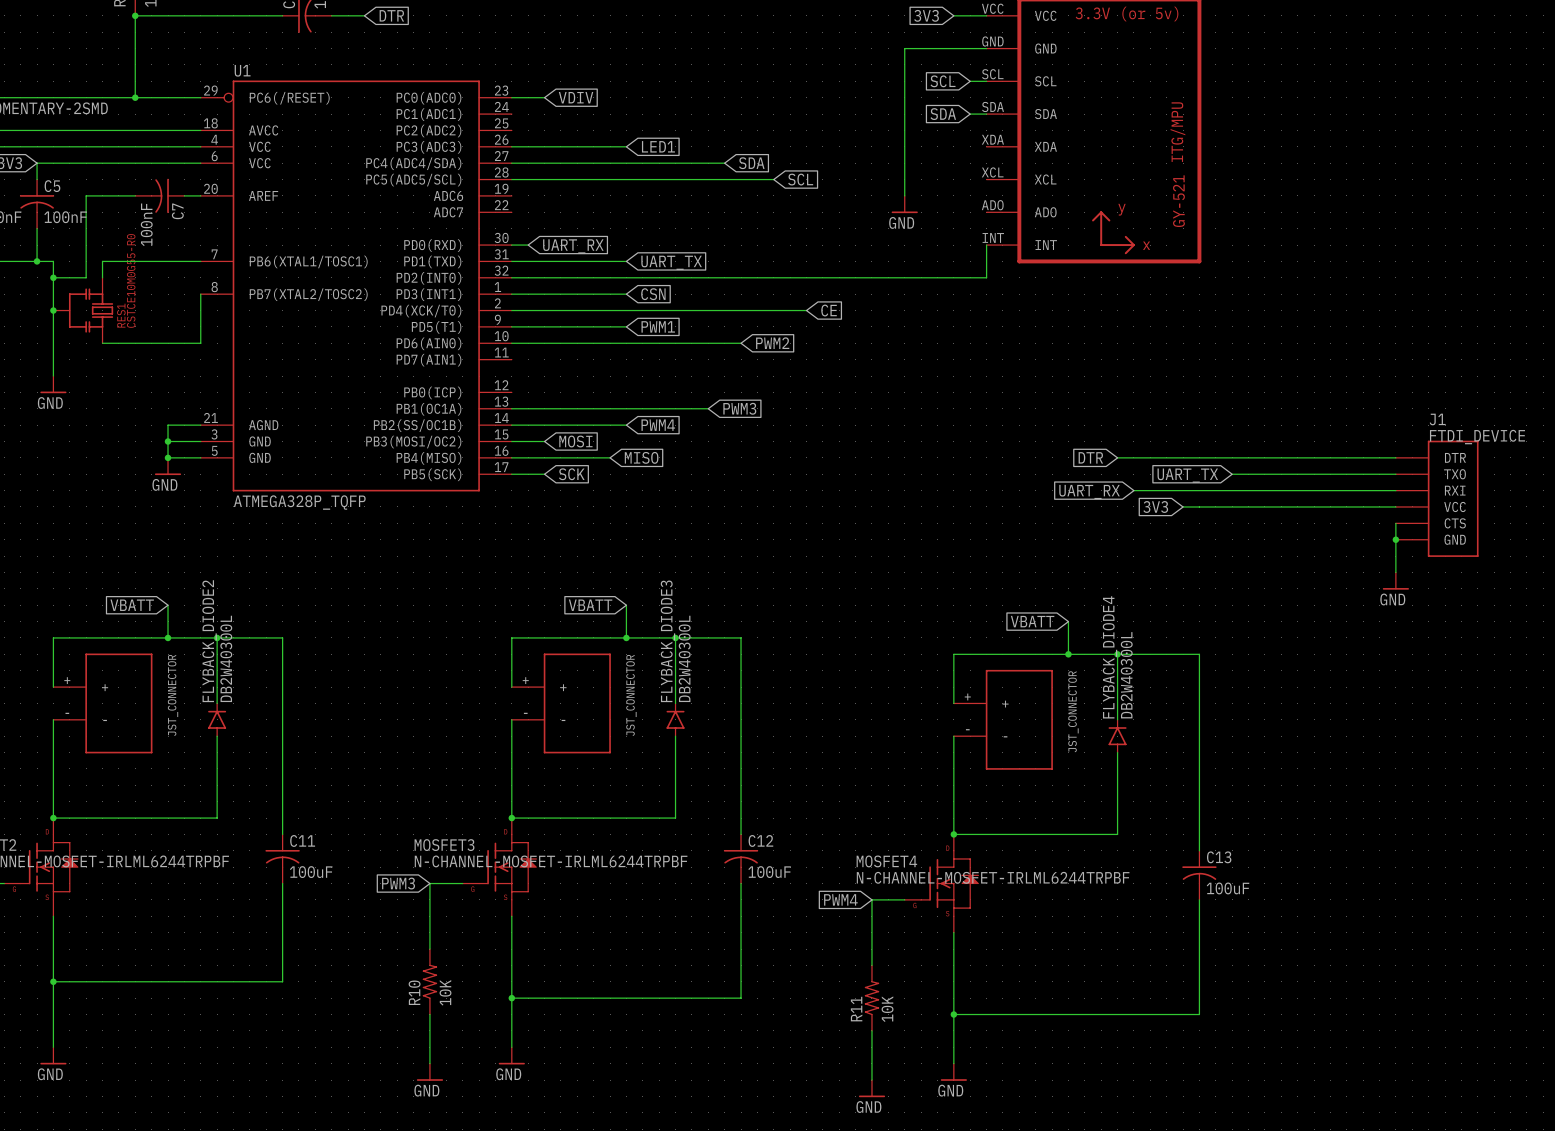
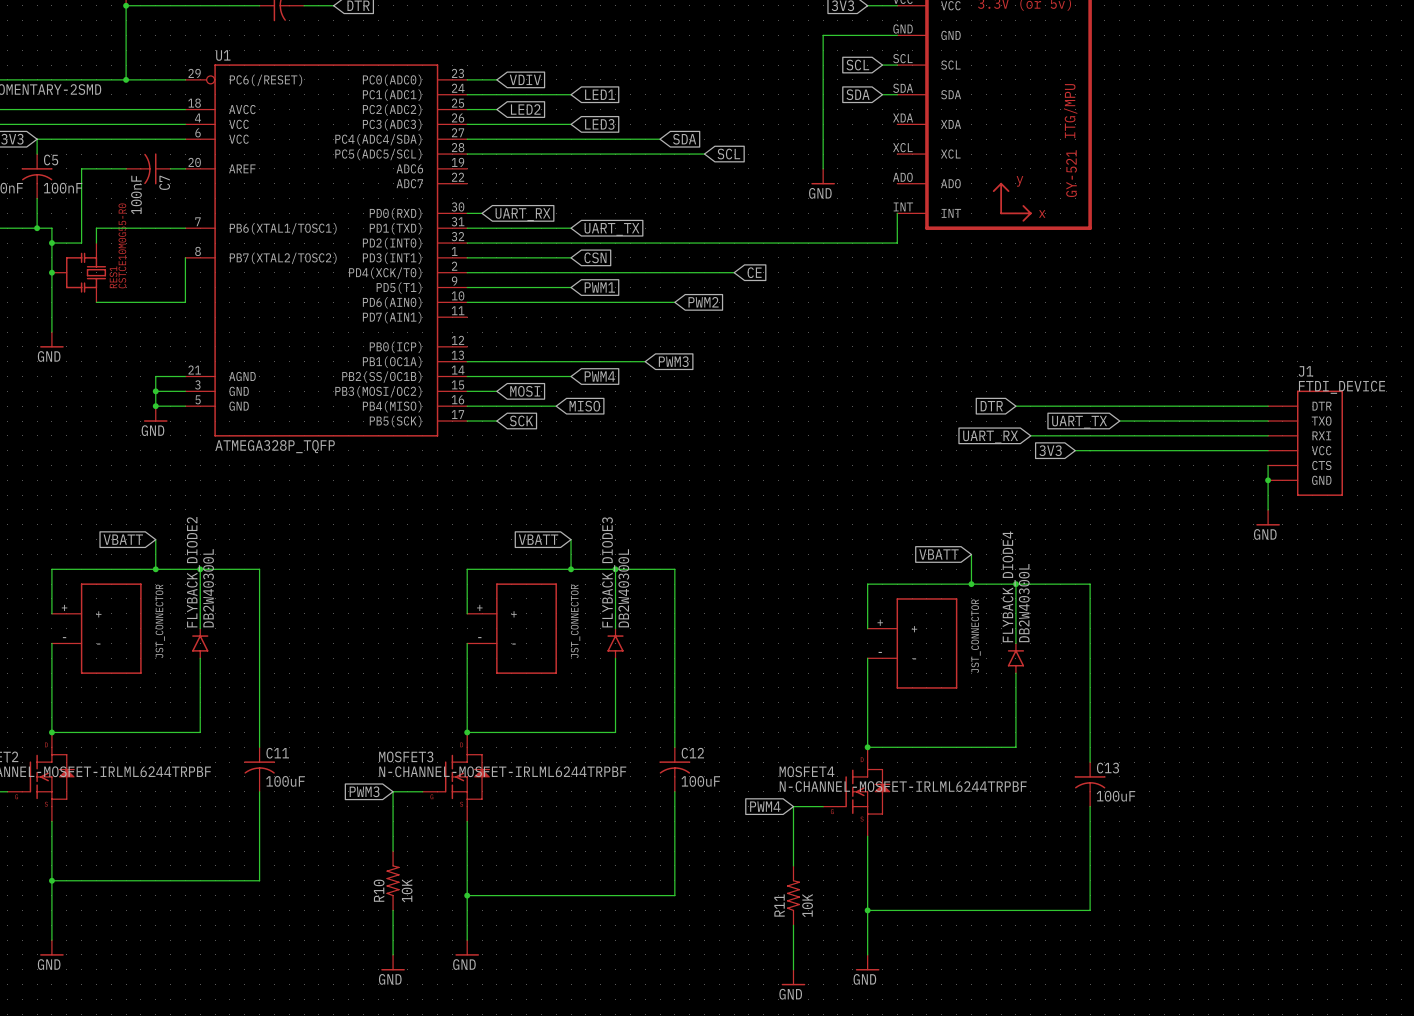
wire: none -> (467, 94) (571, 94)
global label: none -> LED1 (600, 94)
wire: none -> (467, 109) (496, 109)
global label: none -> LED2 (525, 109)
global label: LED1 (658, 146) -> LED3 (599, 124)

